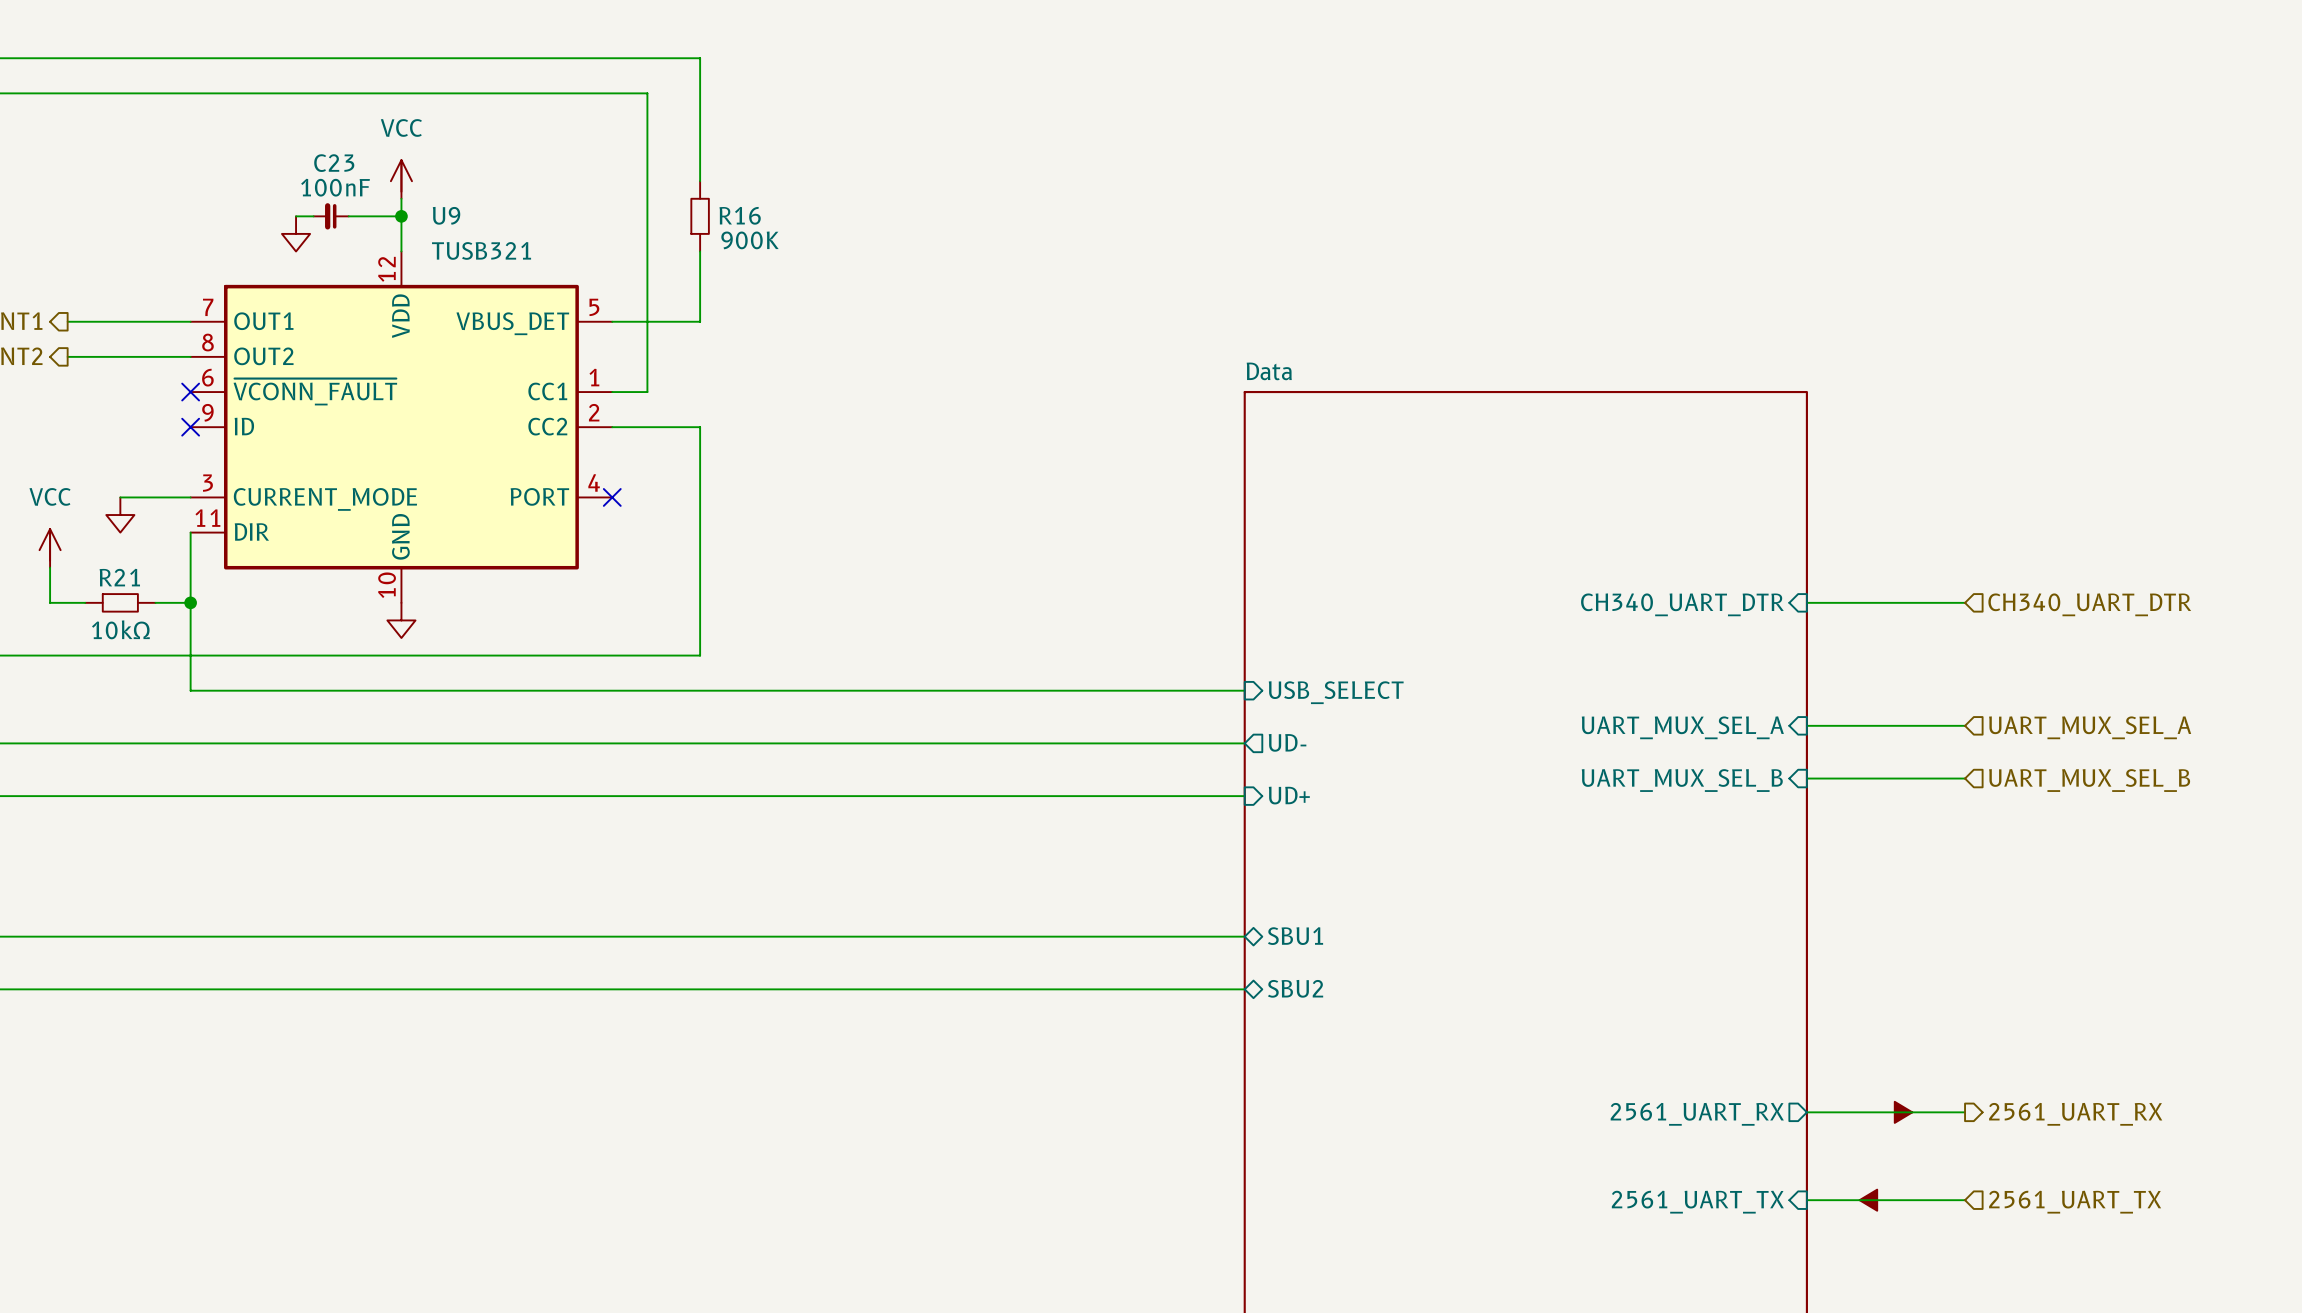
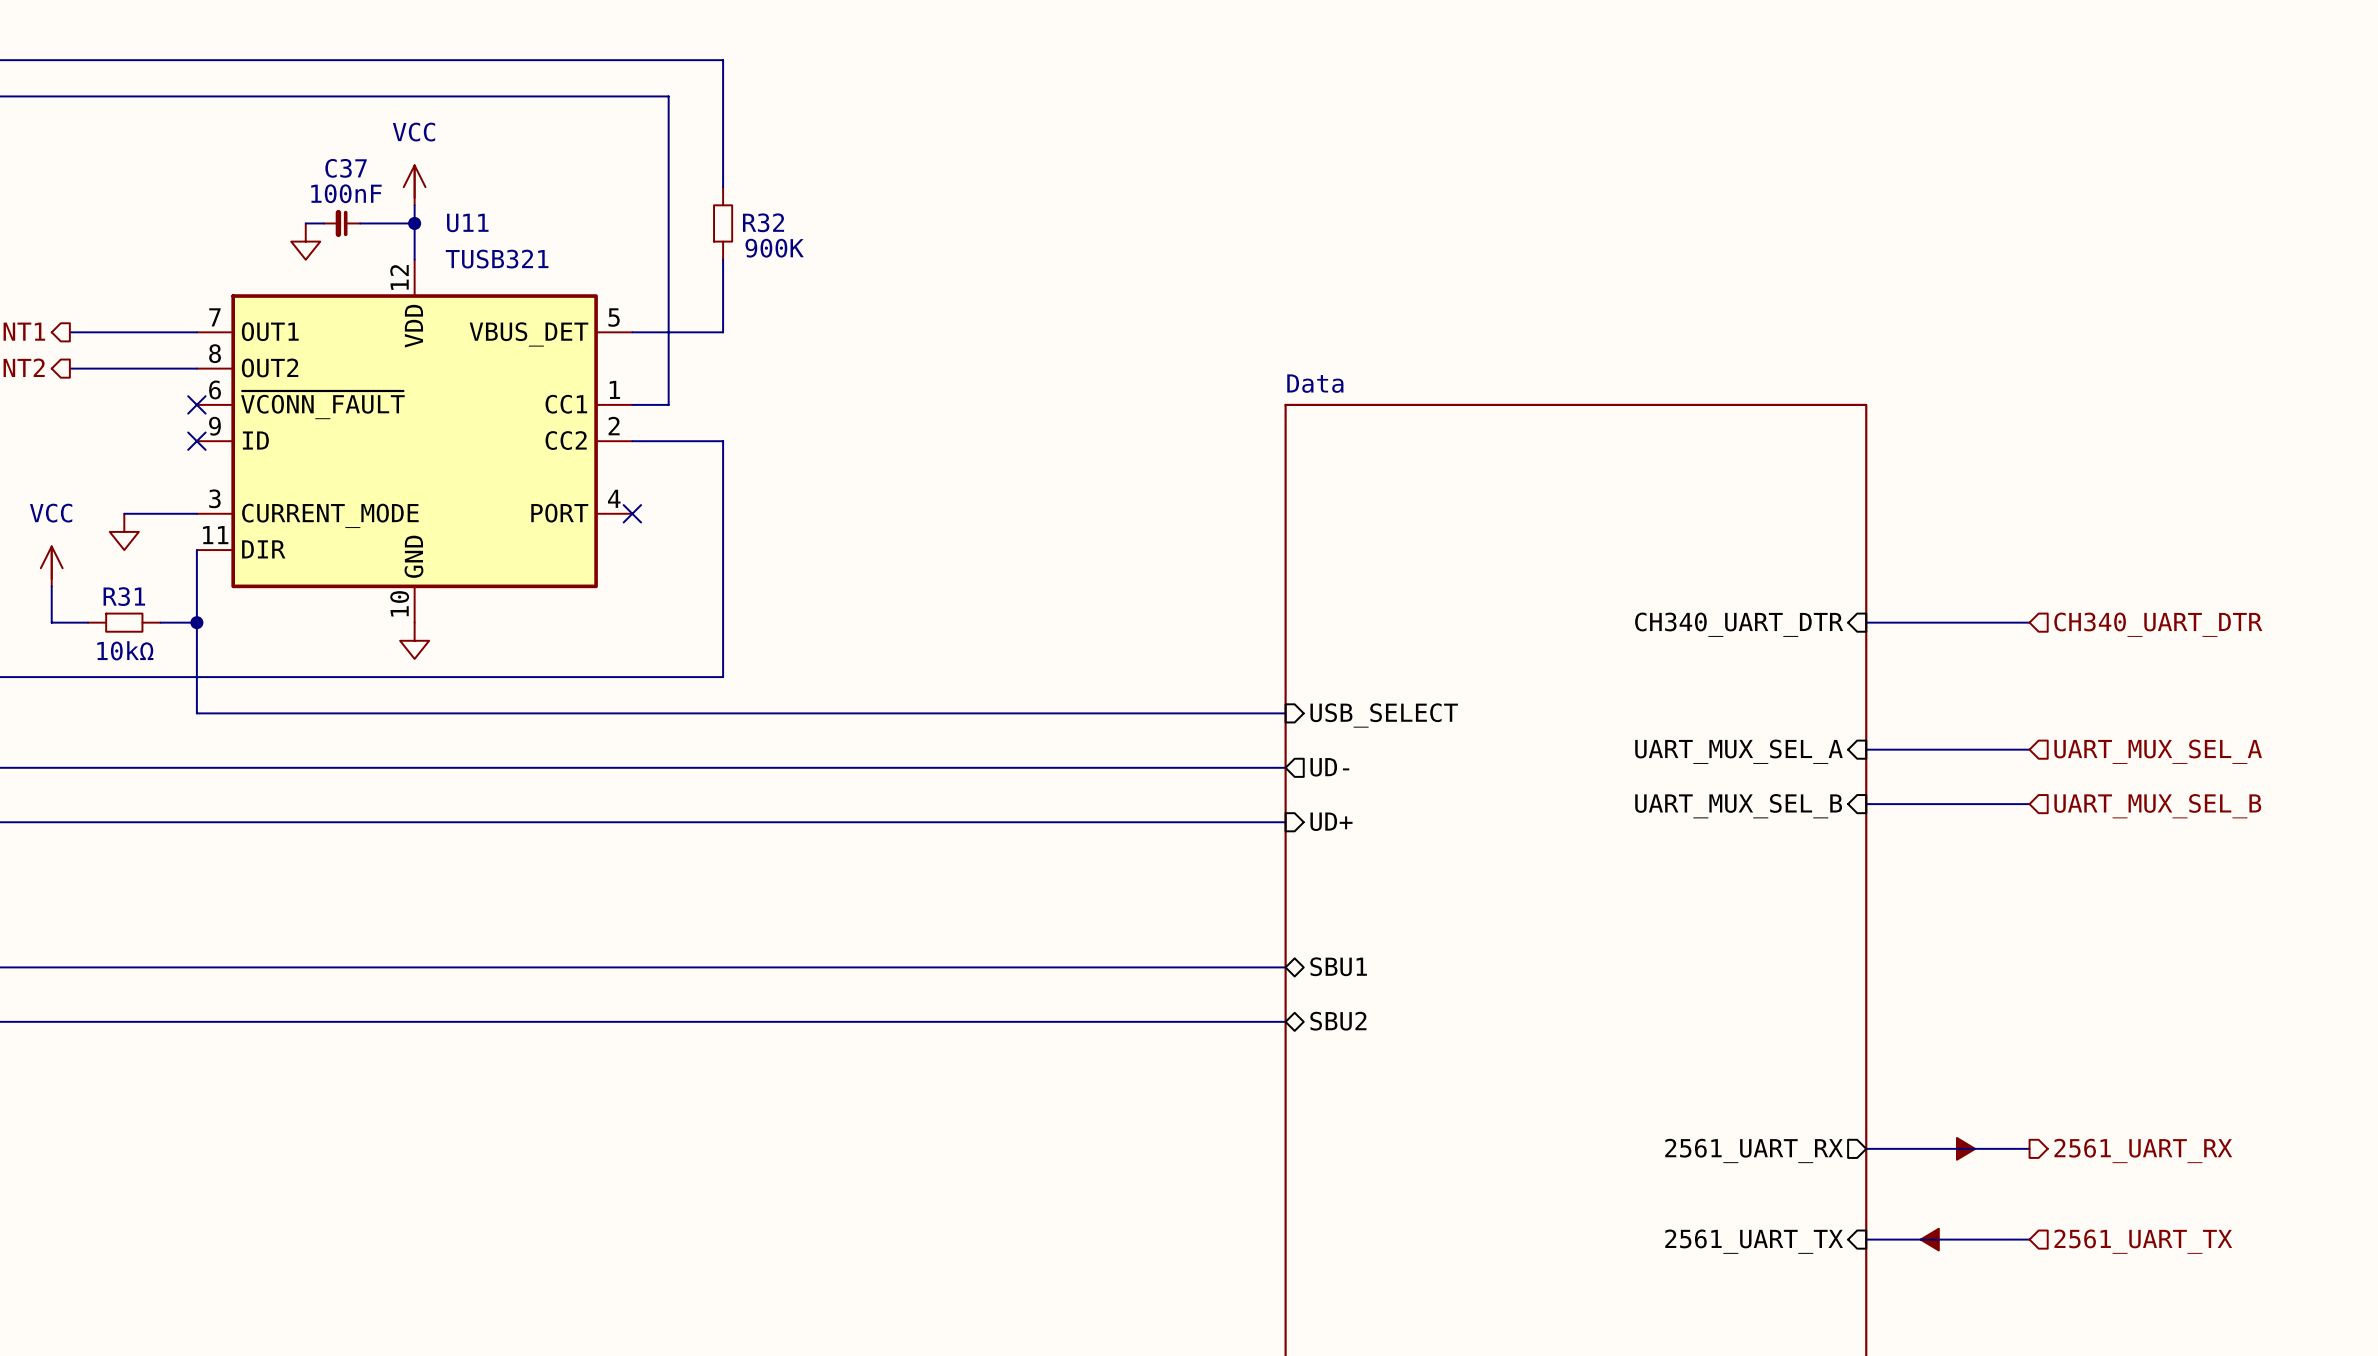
C23 name: C23 (334, 163) -> C37 (346, 168)
U9 name: U9 (446, 215) -> U11 (467, 222)
R16 name: R16 (740, 215) -> R32 (763, 222)
R21 name: R21 (119, 577) -> R31 (124, 596)

